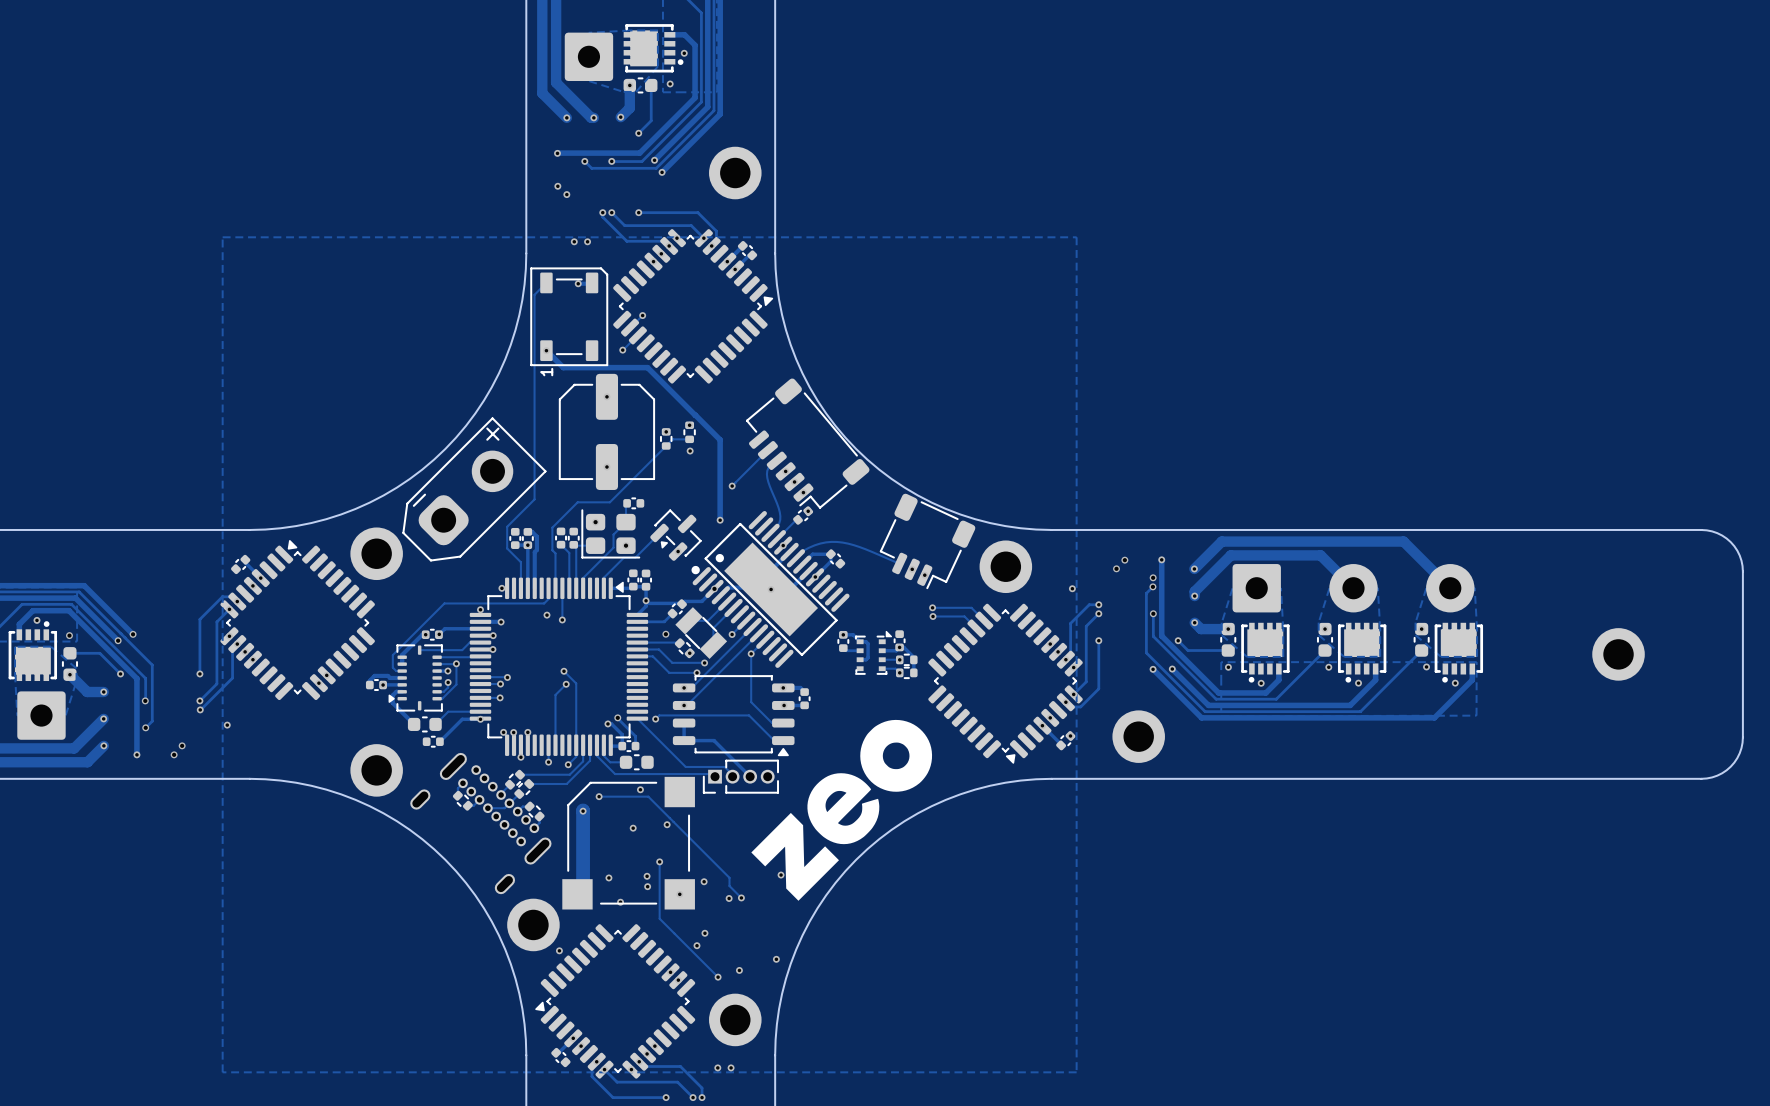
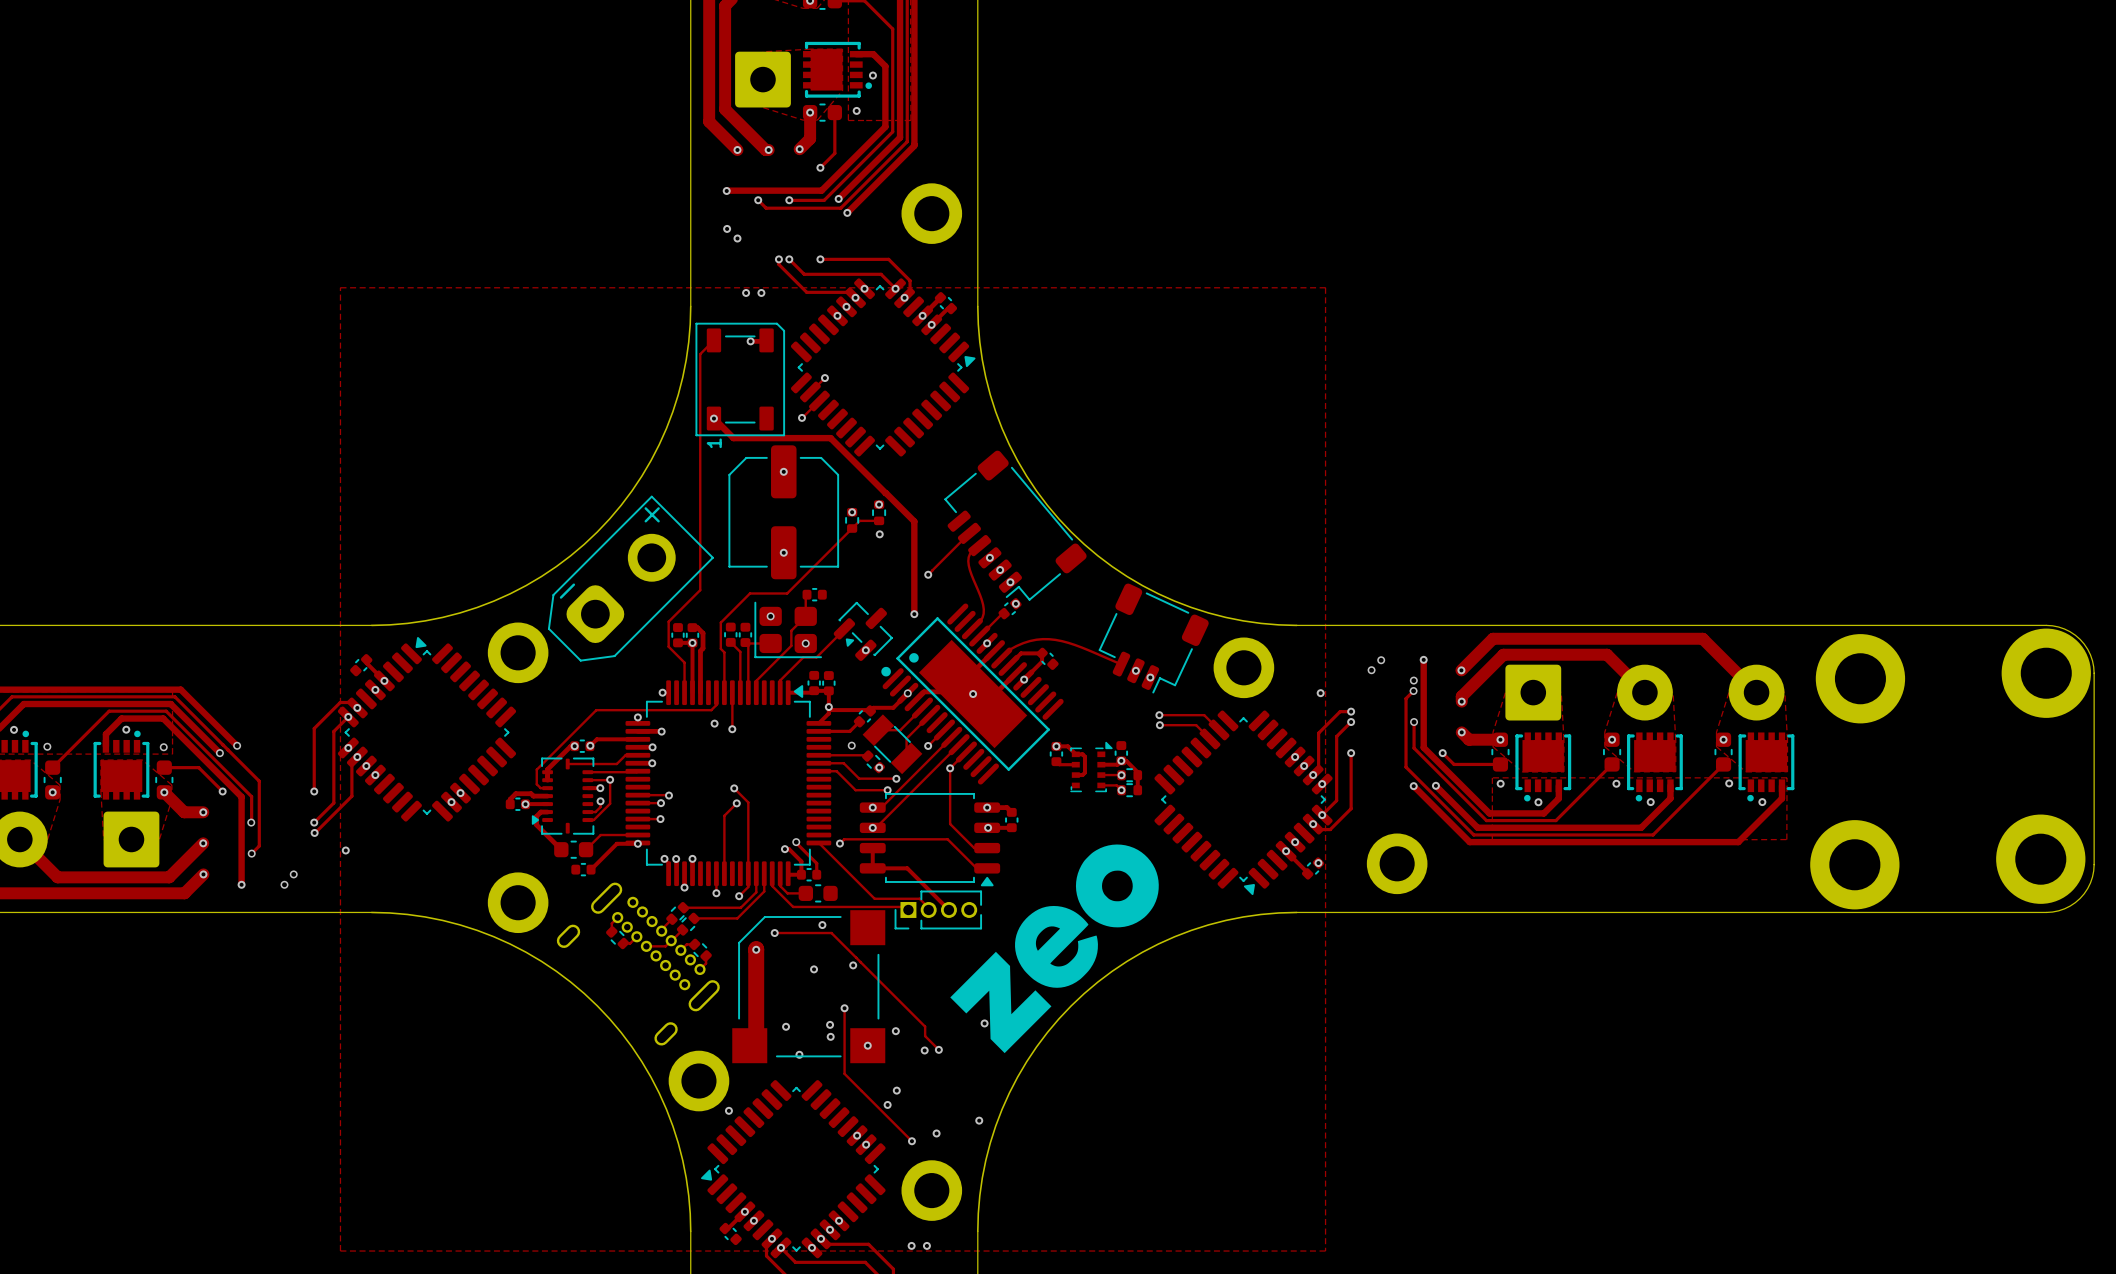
part: none -> (2046, 673)
part: none -> (1860, 678)
part: (1618, 654) -> none
part: none -> (2040, 859)
part: none -> (1854, 864)

